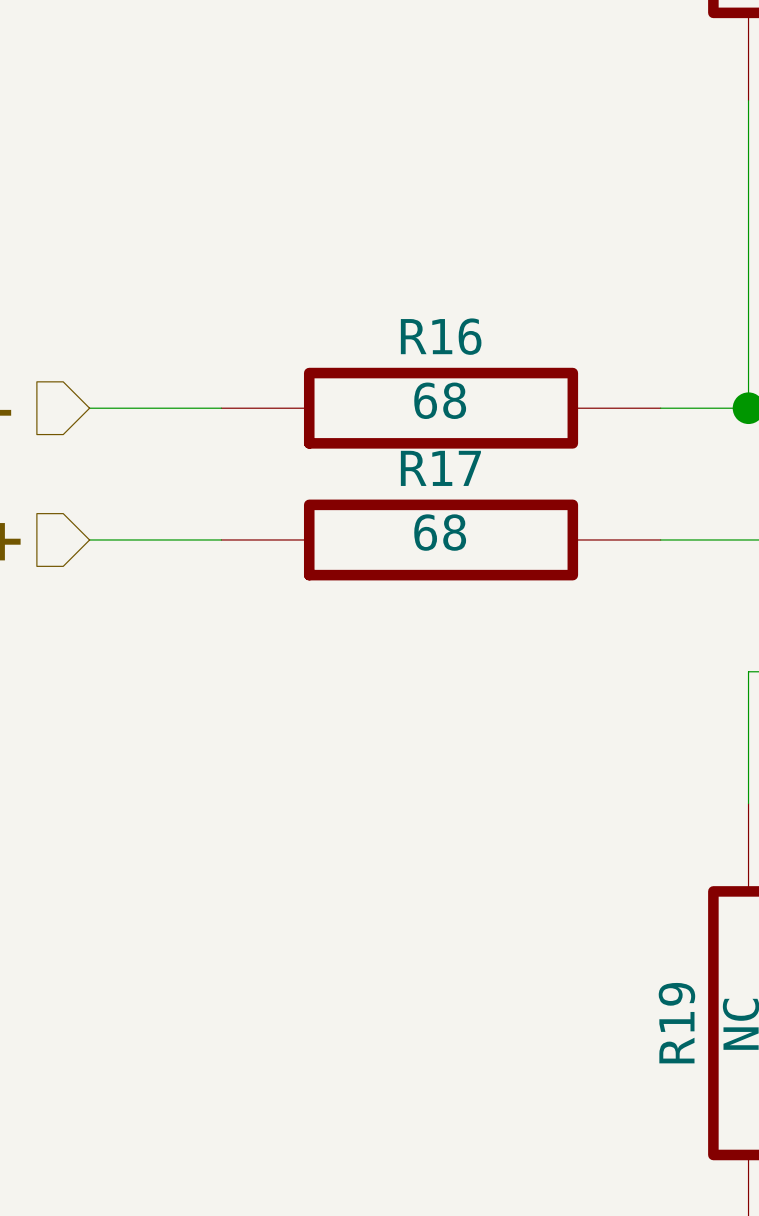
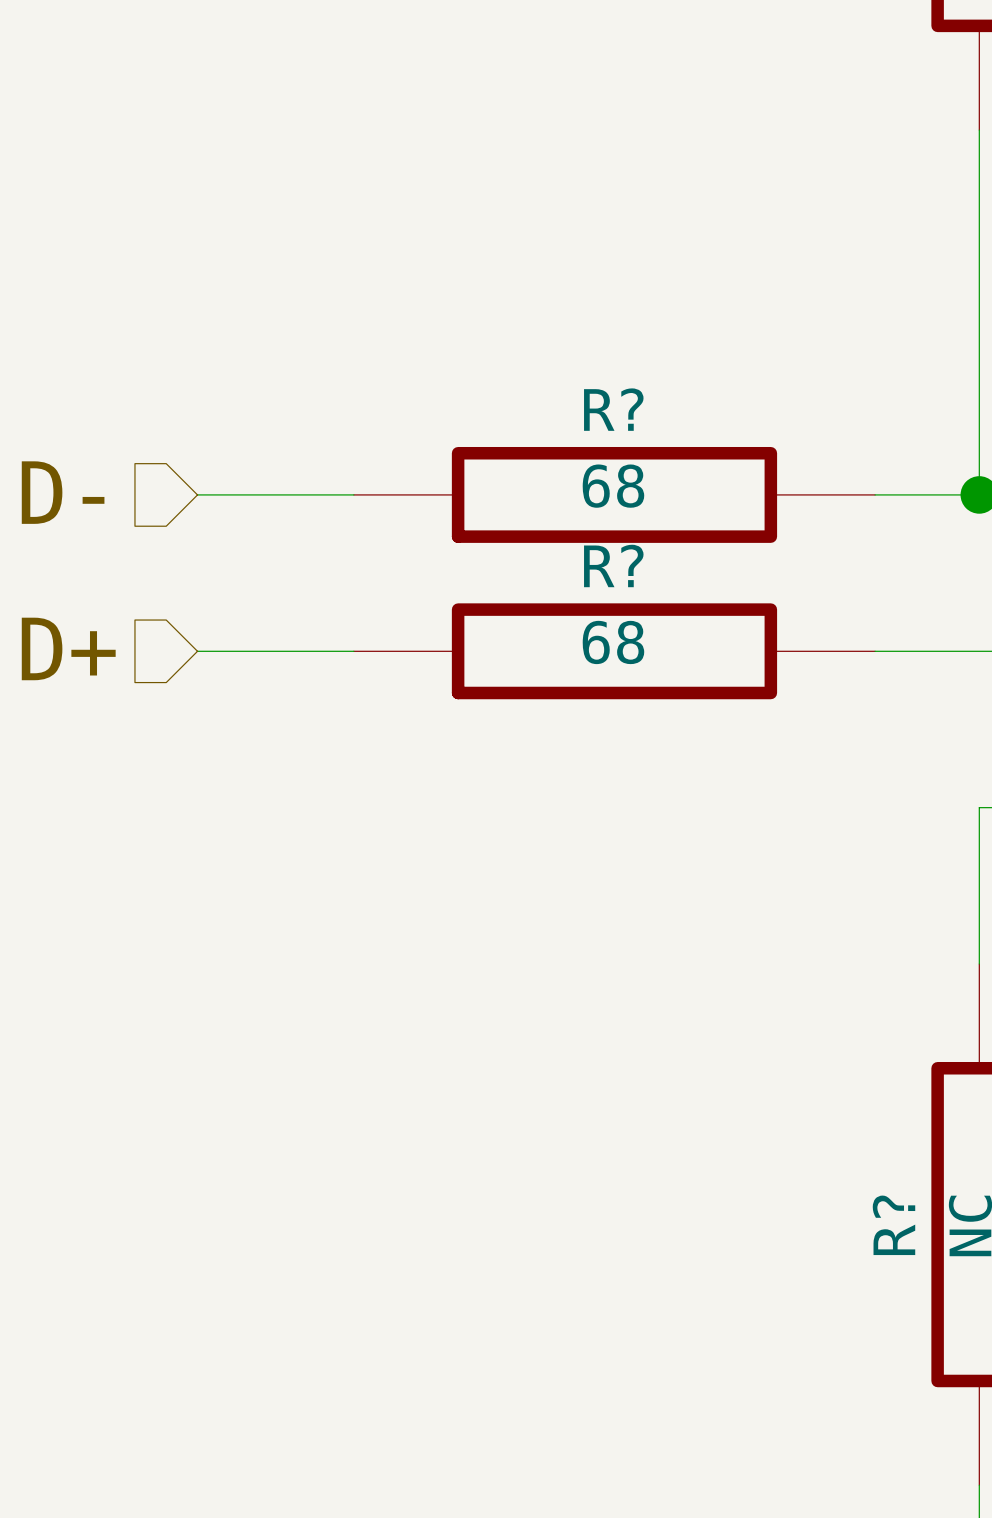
R16 name: R16 (441, 336) -> R? (613, 409)
R17 name: R17 (440, 468) -> R? (613, 565)
R19 name: R19 (676, 1023) -> R? (893, 1225)

